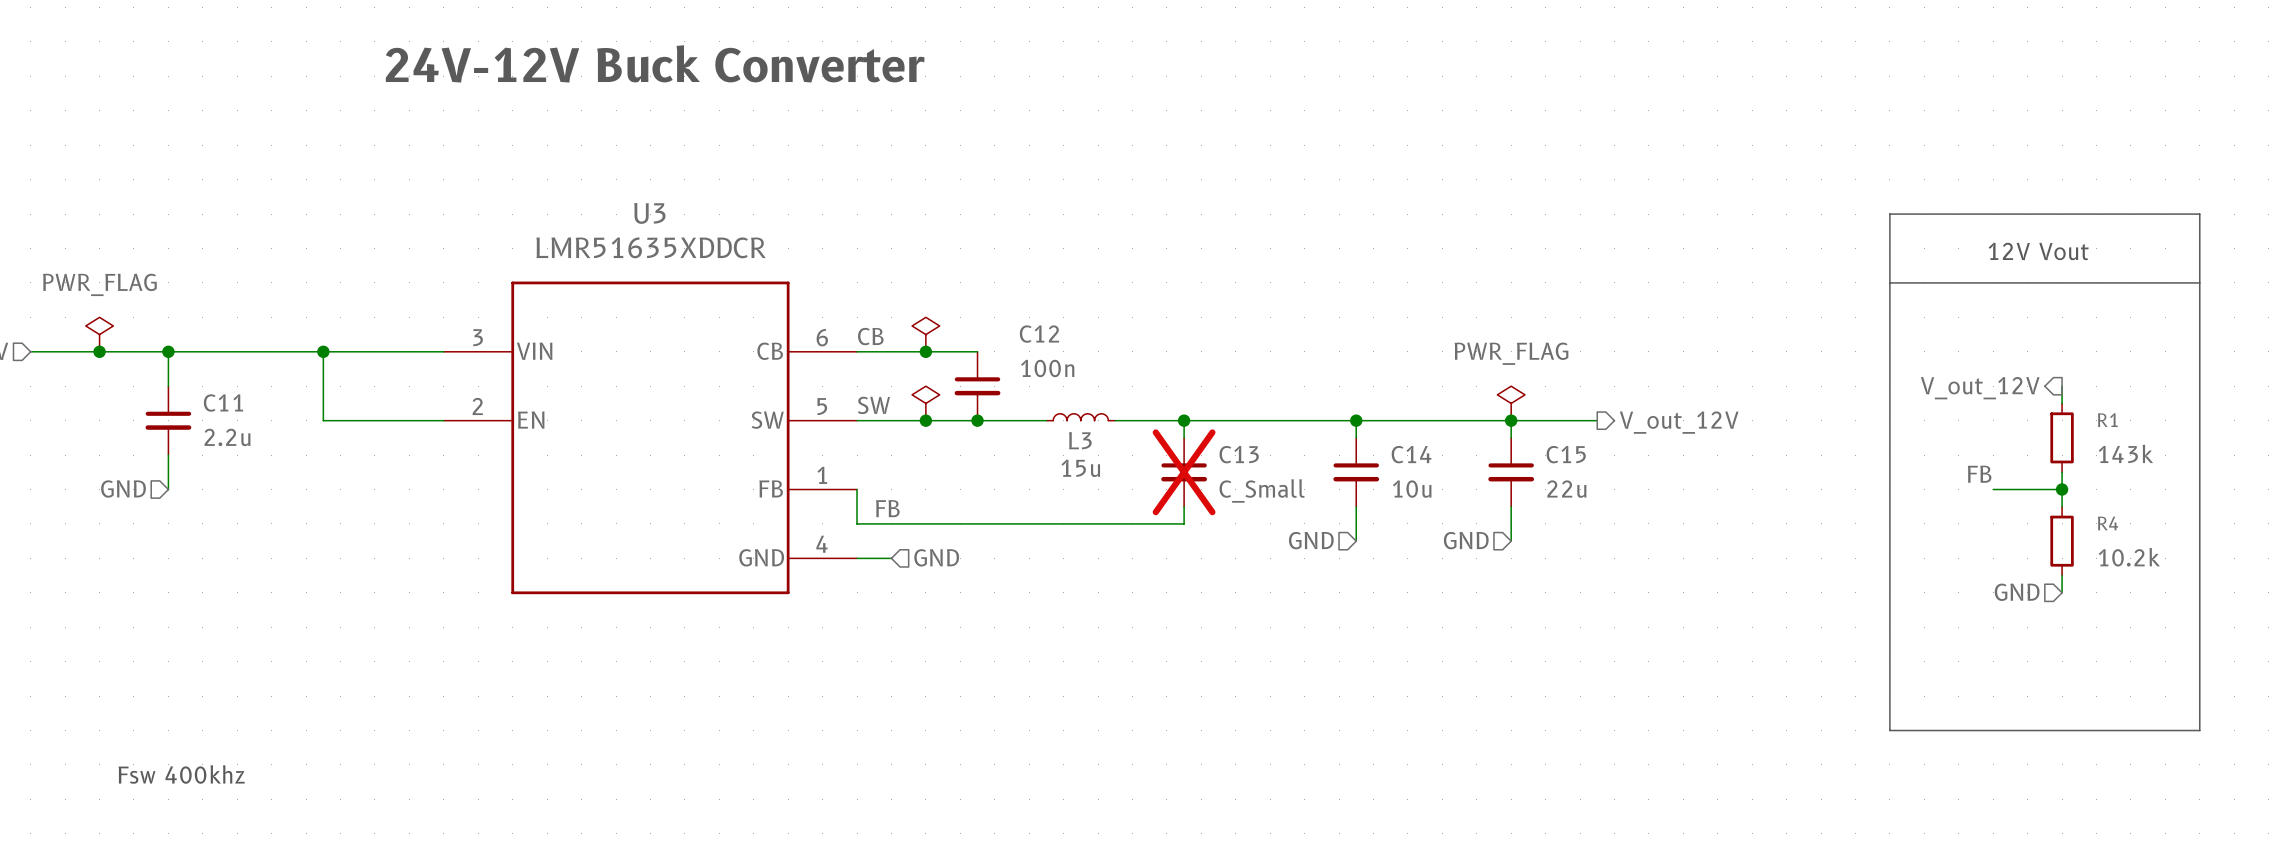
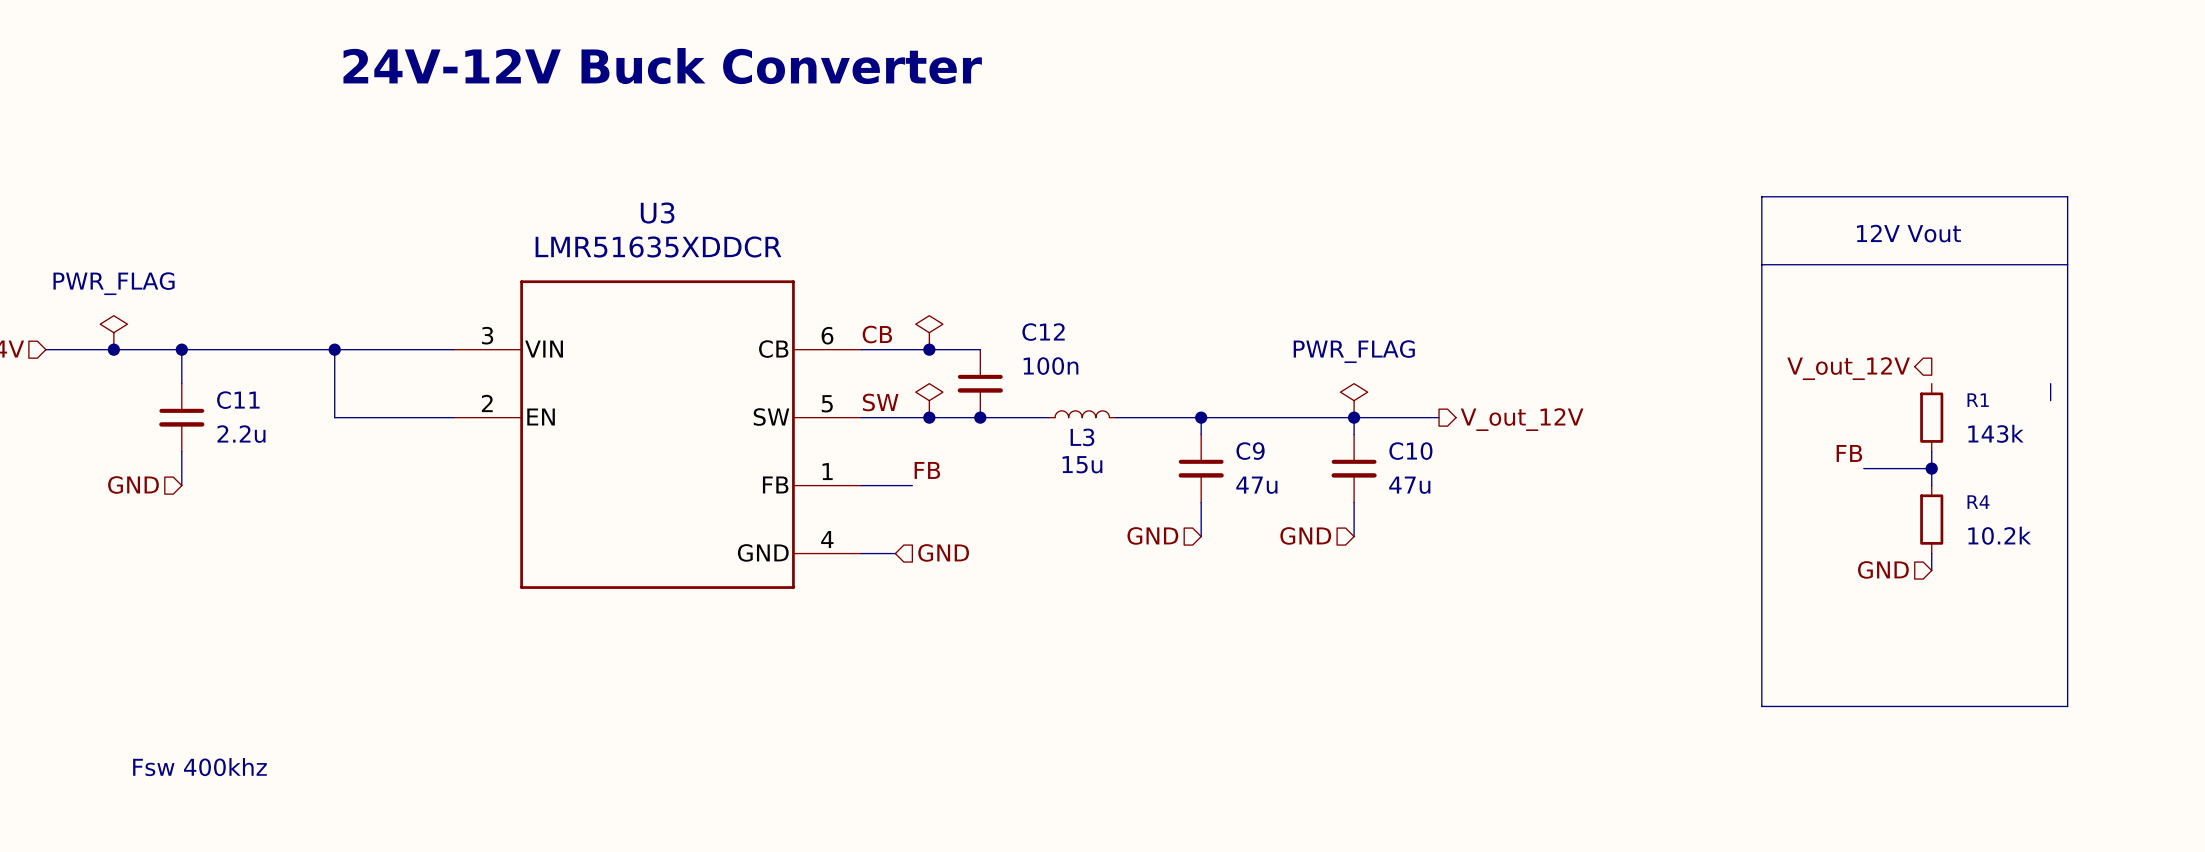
line: (1889, 214) (2199, 214) (2199, 730) (1889, 730) (1889, 214) -> (1761, 196) (2067, 196) (2067, 706) (1761, 706) (1761, 196)
text position: 12V Vout (2038, 251) -> 12V Vout (1908, 233)
line: (1889, 282) (2199, 282) -> (1761, 264) (2067, 264)
hierarchical label position: V_out_12V (1980, 388) -> V_out_12V (1848, 368)
power symbol position: PWR_FLAG (1511, 403) -> PWR_FLAG (1354, 400)
wire: (1184, 420) (1184, 437) -> none
junction position: (1184, 420) -> (1201, 417)
wire: (1442, 420) (1597, 420) -> none
wire: (1511, 420) (1511, 437) -> (1201, 417) (1201, 434)
junction: (1511, 420) -> none
hierarchical label position: V_out_12V (1679, 422) -> V_out_12V (1522, 419)
R1 position: (2062, 437) -> (1931, 417)
C14 name: C14 (1411, 454) -> C10 (1410, 451)
C13: C_Small (1184, 472) -> none
C9: none -> 47u (1201, 468)
C15: 22u (1511, 472) -> none
junction: none -> (1931, 468)
wire: (2062, 472) (2062, 506) -> (1931, 451) (1931, 485)
label position: FB (1979, 474) -> FB (1849, 453)
wire: (857, 489) (857, 523) (1184, 523) (1184, 506) -> (861, 485) (912, 485)
C14 value: 10u (1412, 489) -> 47u (1409, 485)
wire: (1993, 489) (2062, 489) -> (1863, 468) (1931, 468)
junction: (2062, 489) -> none
wire: (1511, 506) (1511, 541) -> (1201, 502) (1201, 536)
label position: FB (887, 508) -> FB (927, 470)
hierarchical label: none -> GND (1152, 535)
hierarchical label: GND (1466, 540) -> none
R4 position: (2062, 541) -> (1931, 519)
wire: (2062, 575) (2062, 592) -> (1931, 553) (1931, 570)
hierarchical label position: GND (2017, 592) -> GND (1883, 569)

